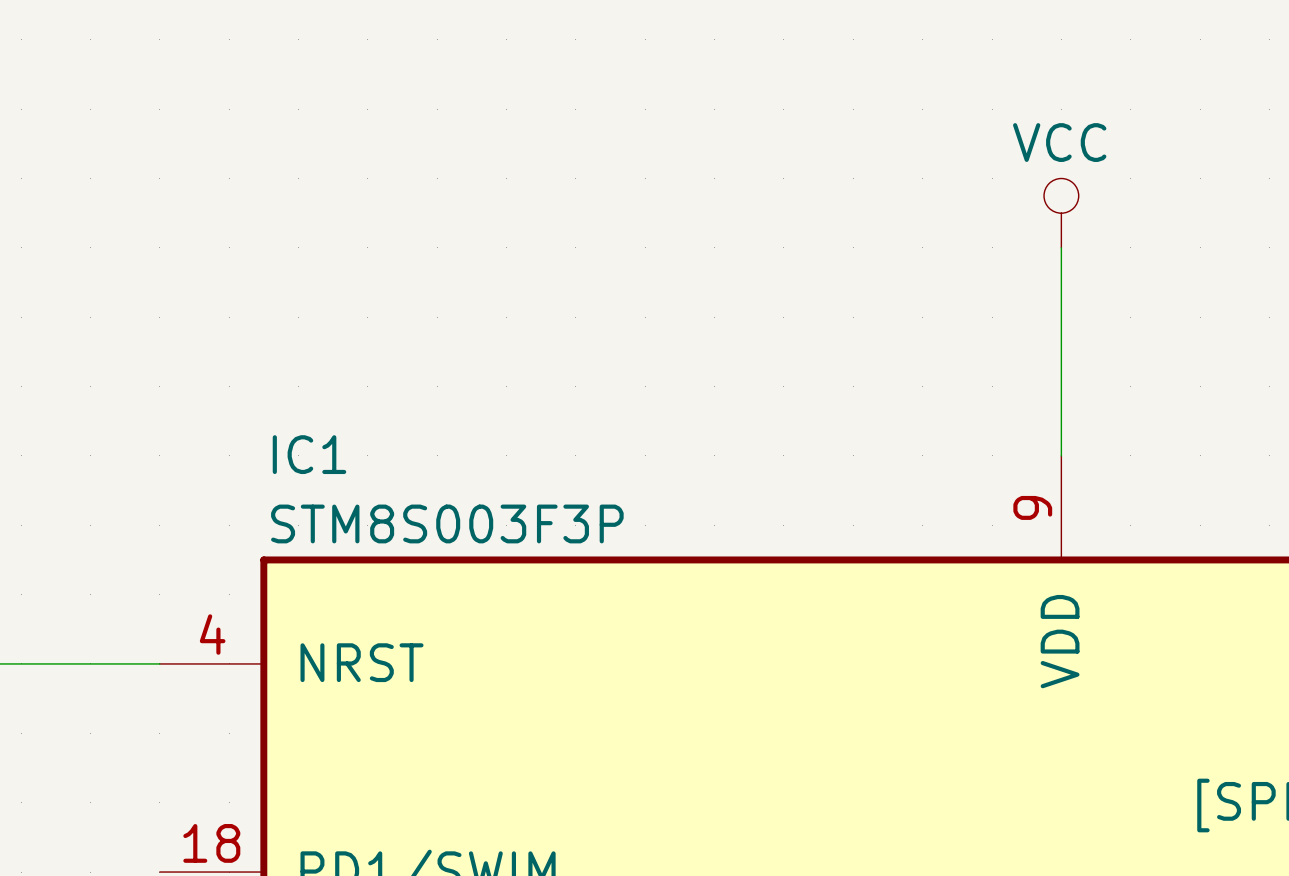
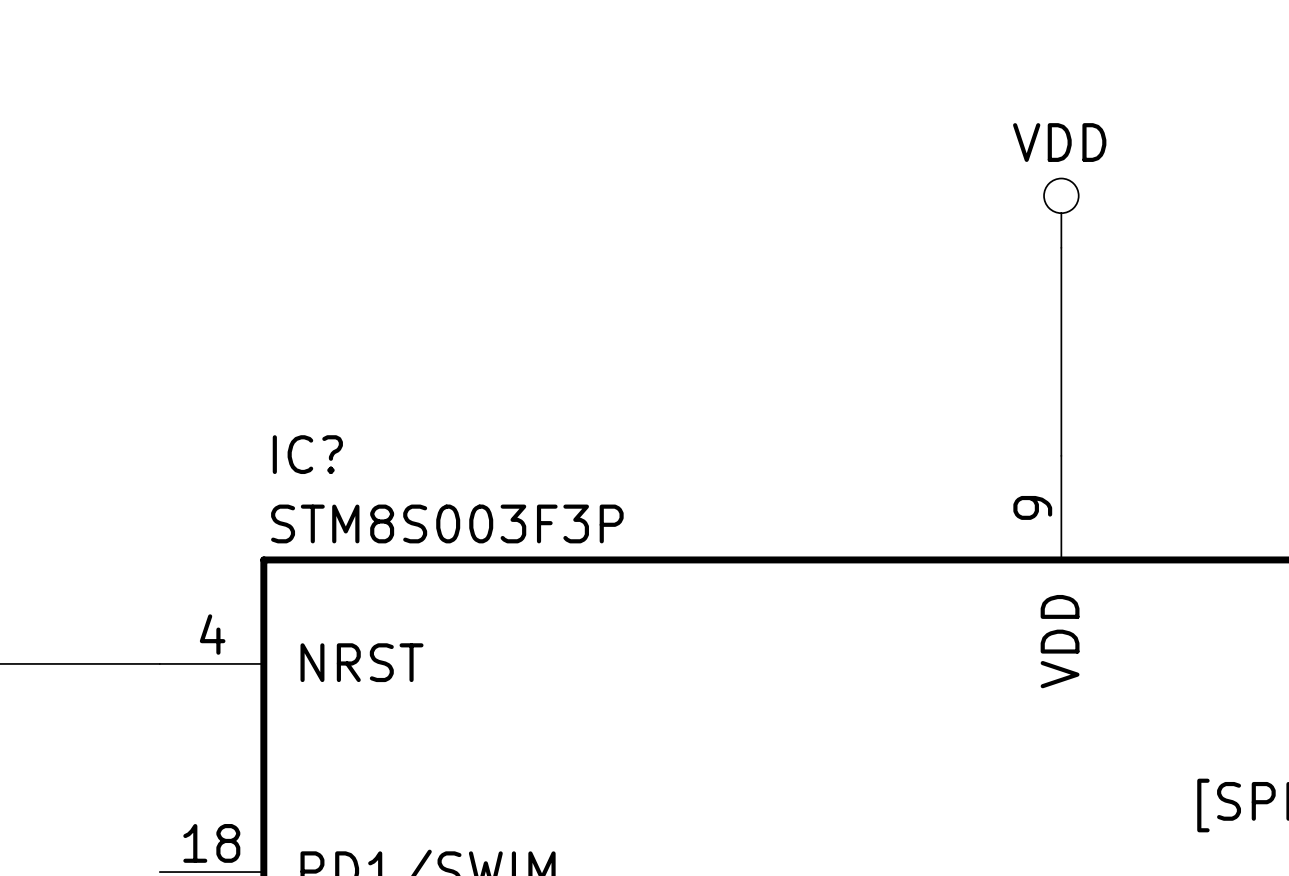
power symbol: VCC (1061, 213) -> VDD (1061, 213)
IC1 name: IC1 (309, 454) -> IC? (307, 454)

